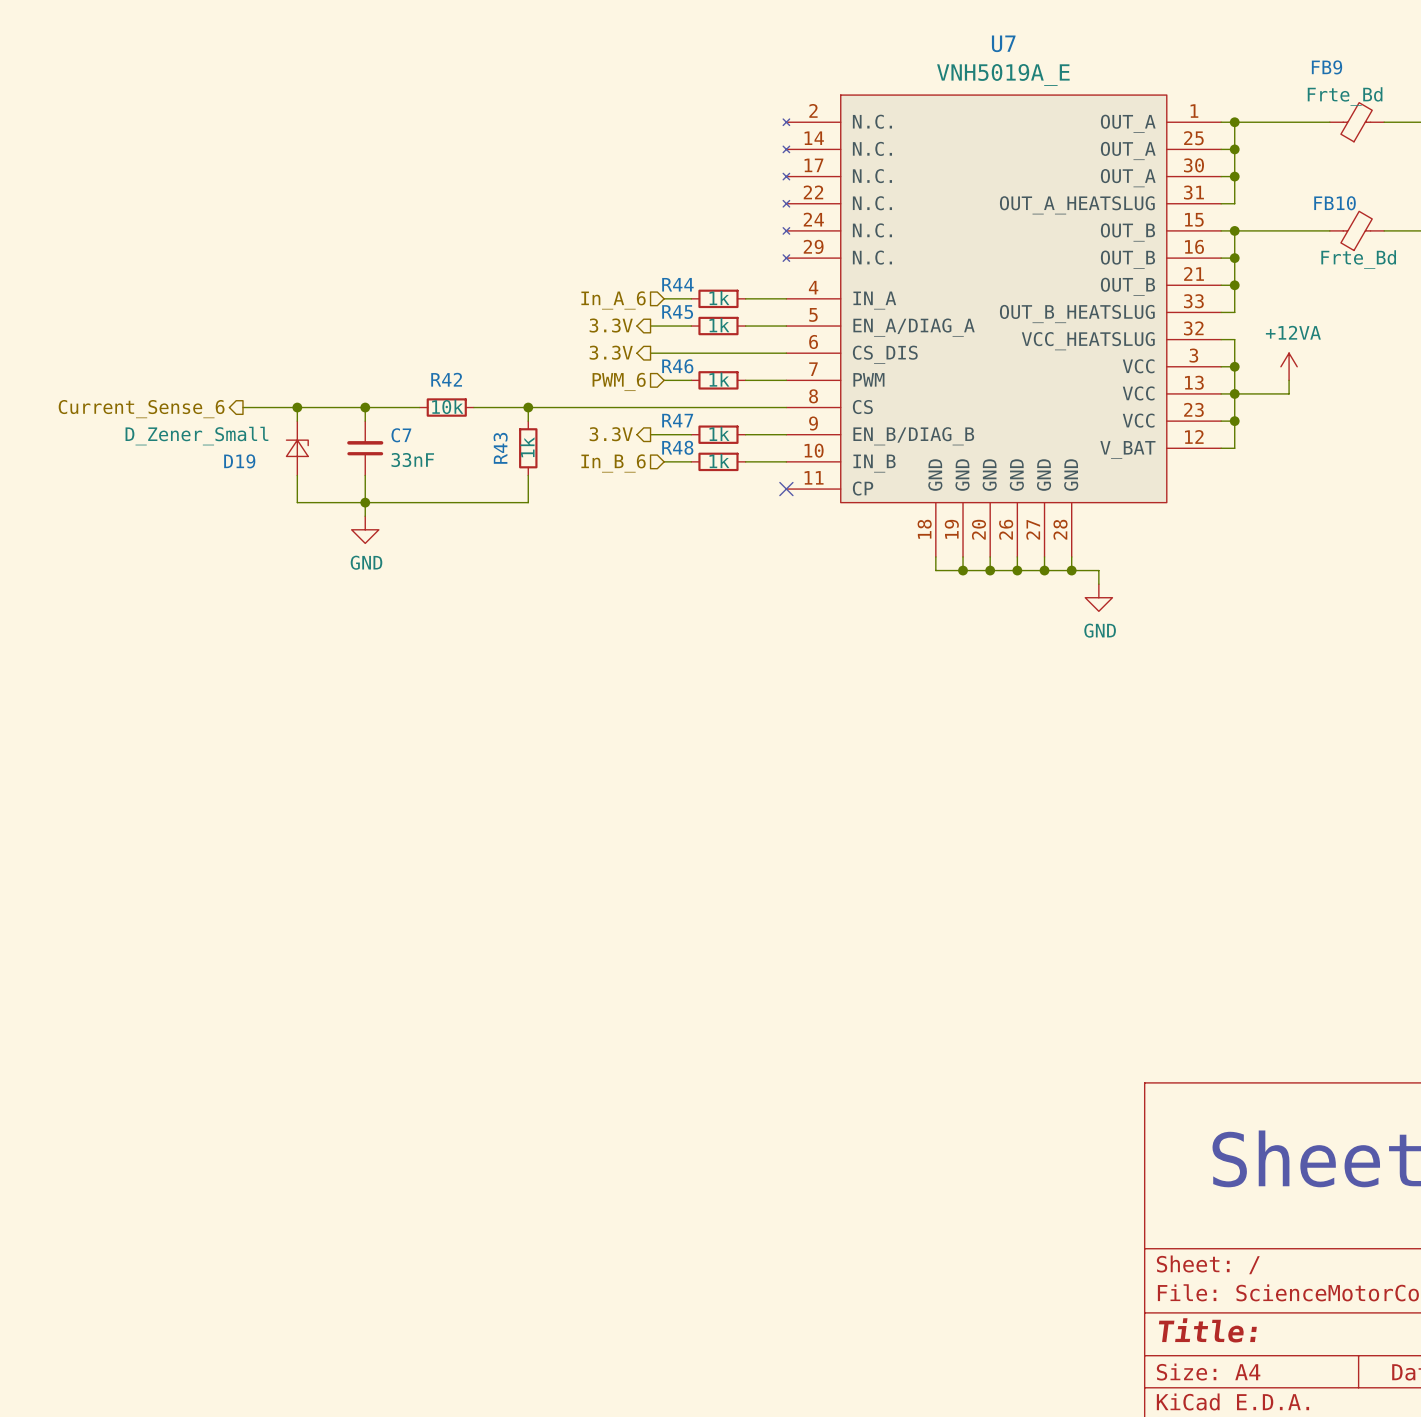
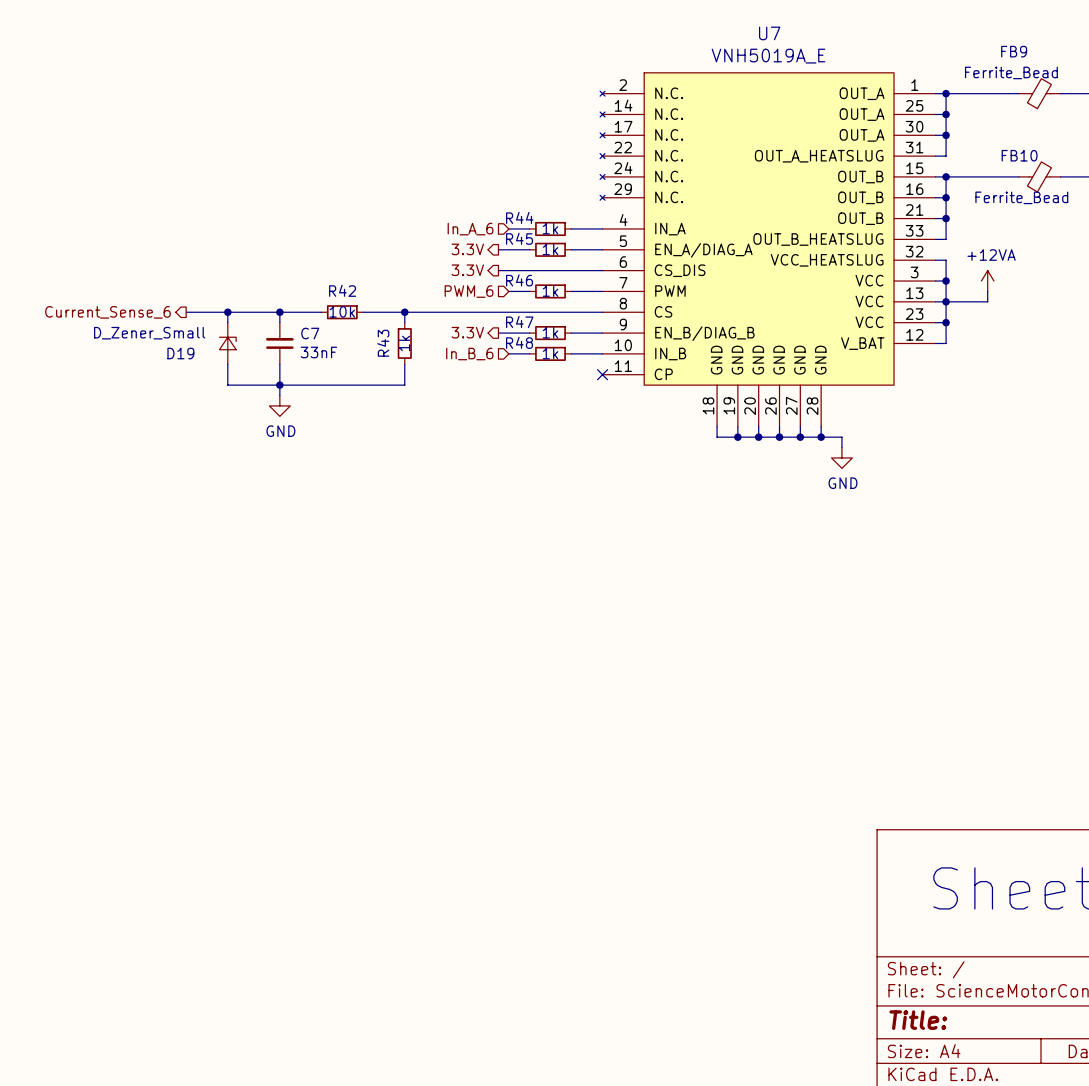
FB9 value: Frte_Bd (1345, 96) -> Ferrite_Bead (1011, 72)
FB10 value: Frte_Bd (1358, 259) -> Ferrite_Bead (1021, 197)

